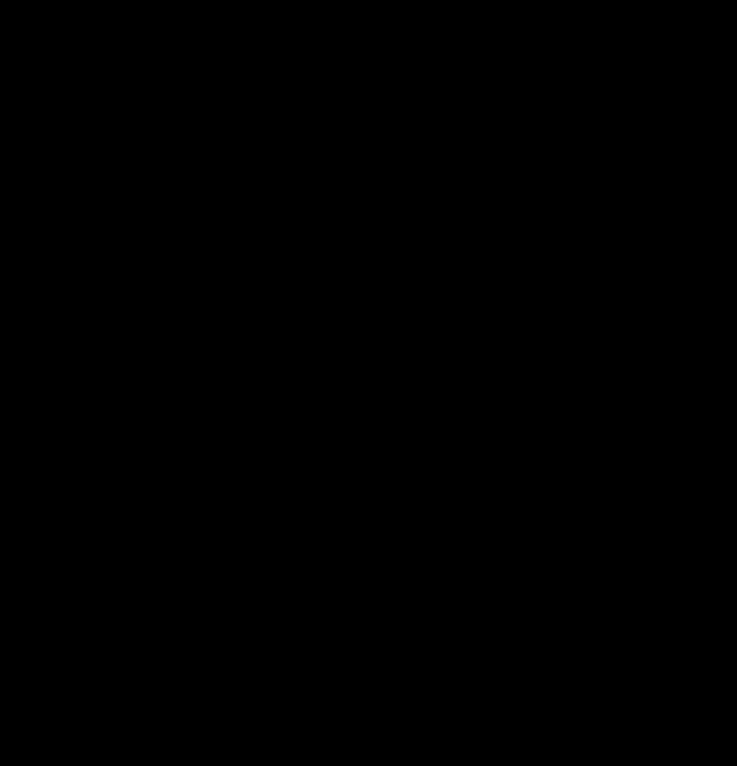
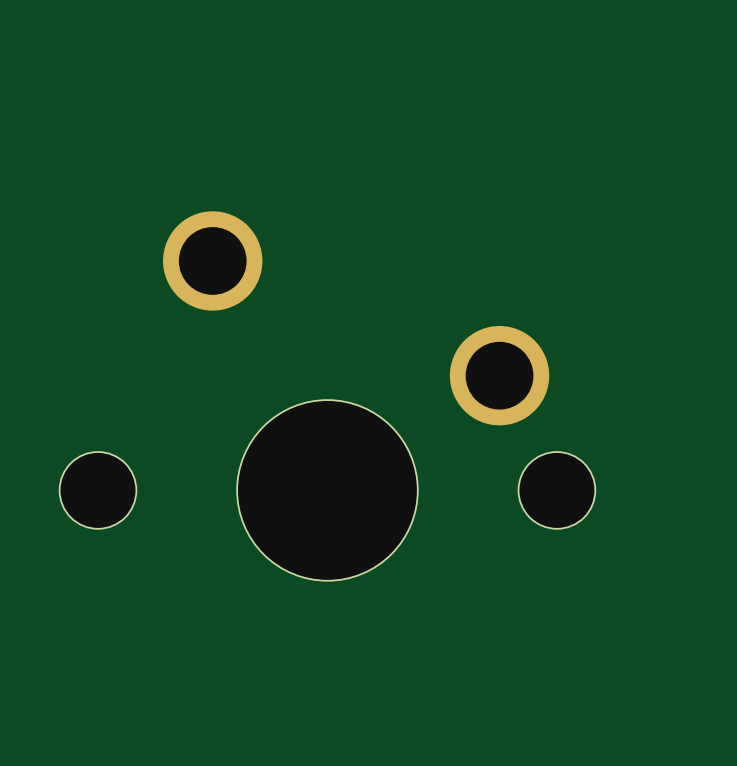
part: none -> (327, 396)

